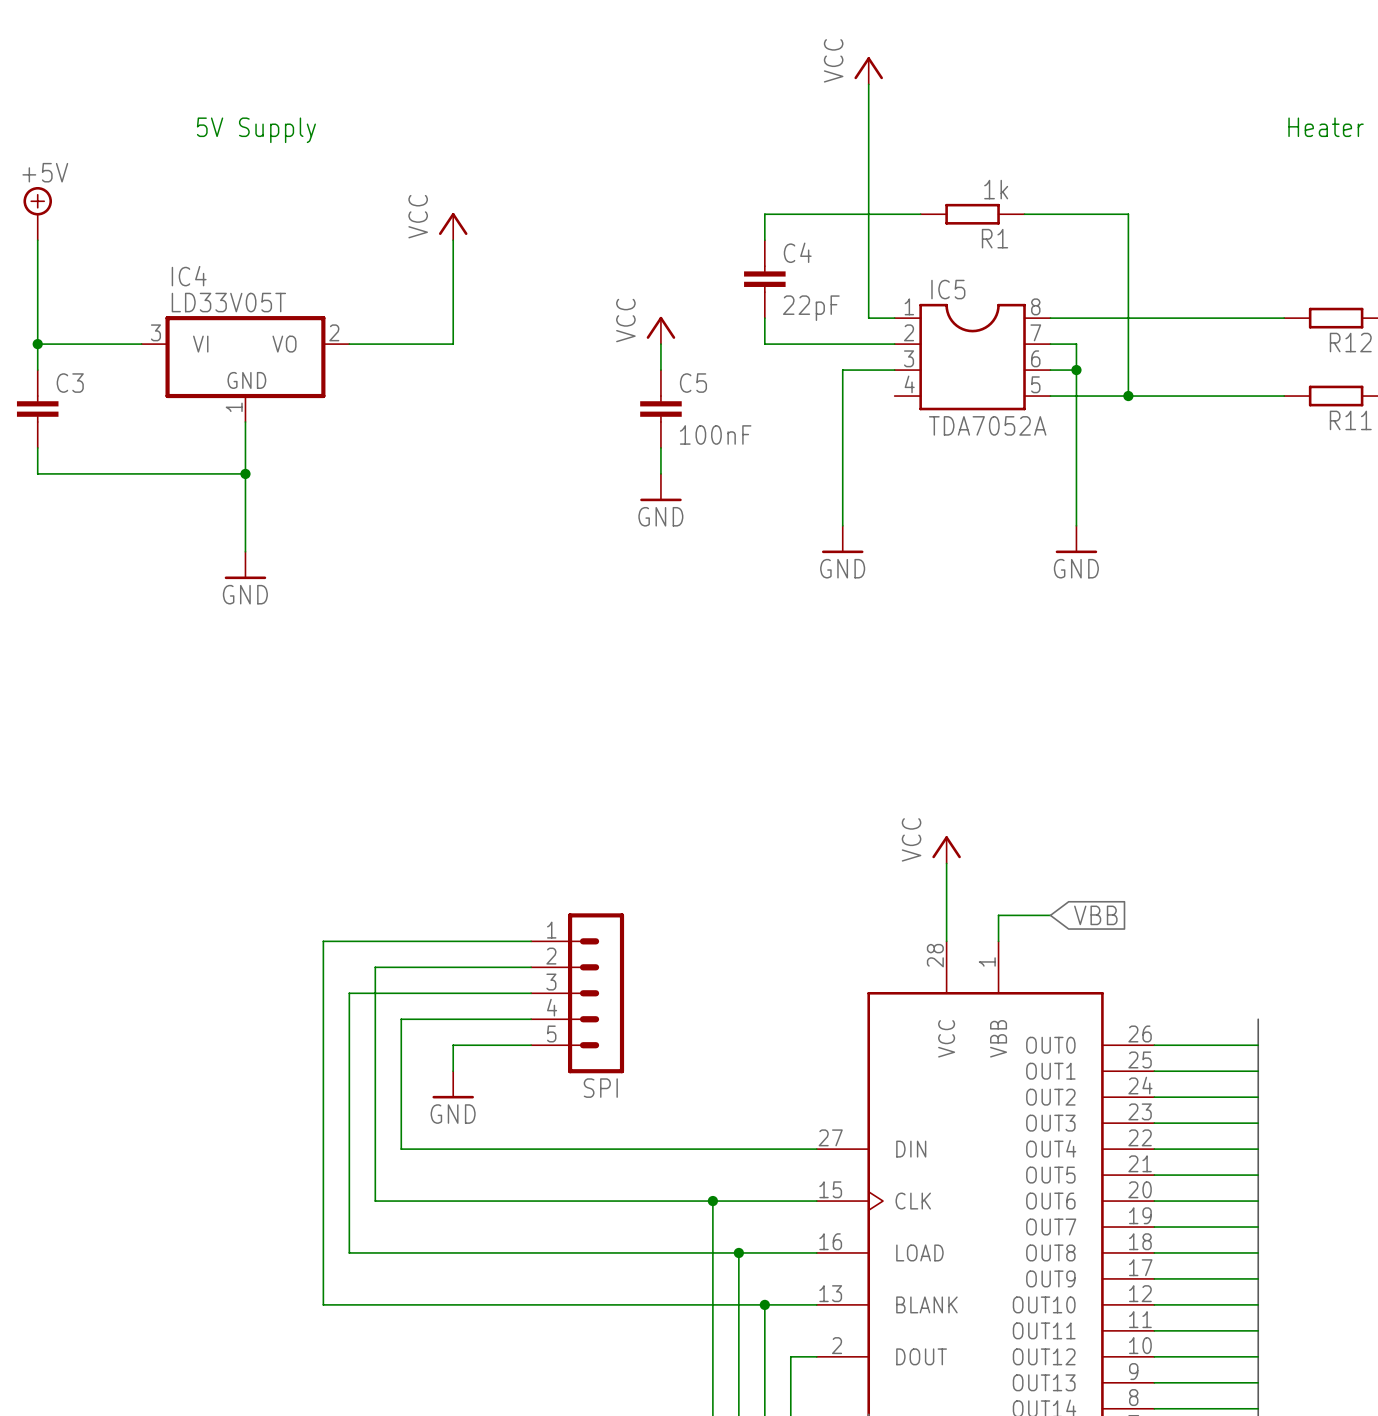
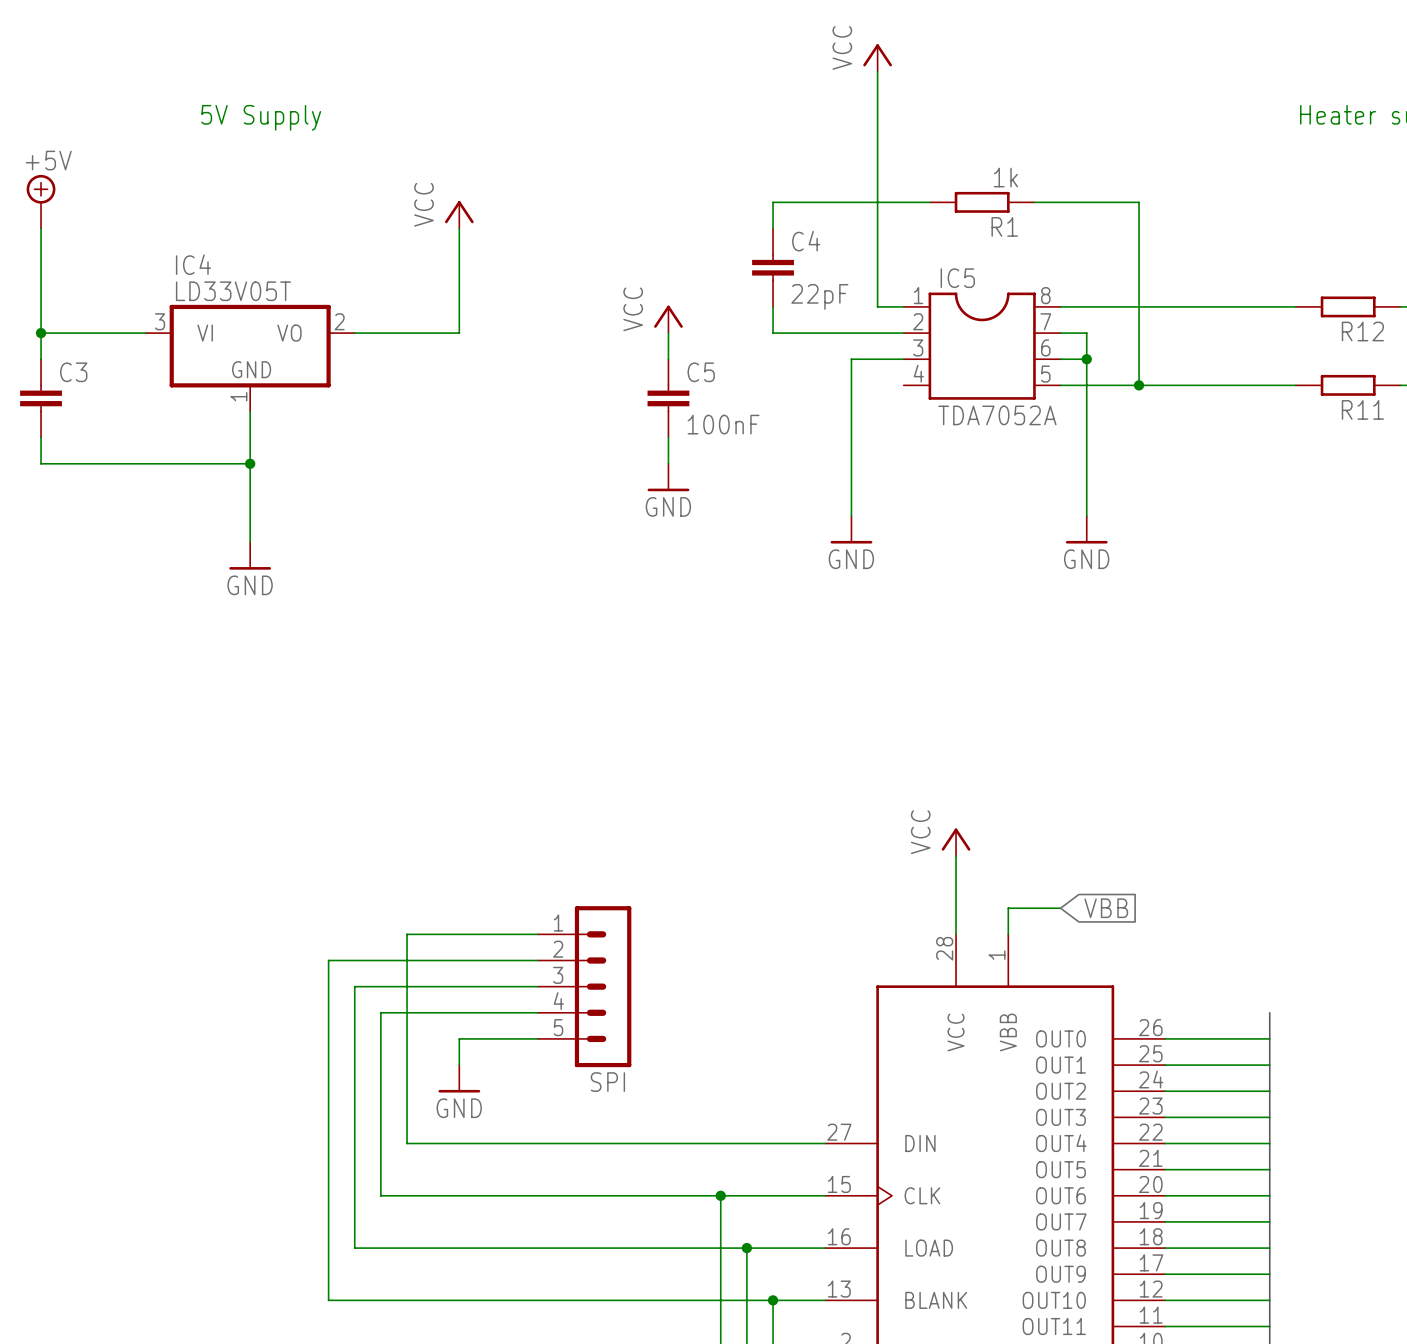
wire: (401, 941) (323, 941) (323, 967) -> (380, 960) (328, 960)
wire: (375, 967) (375, 1019) -> (407, 934) (407, 1012) (380, 1012)

